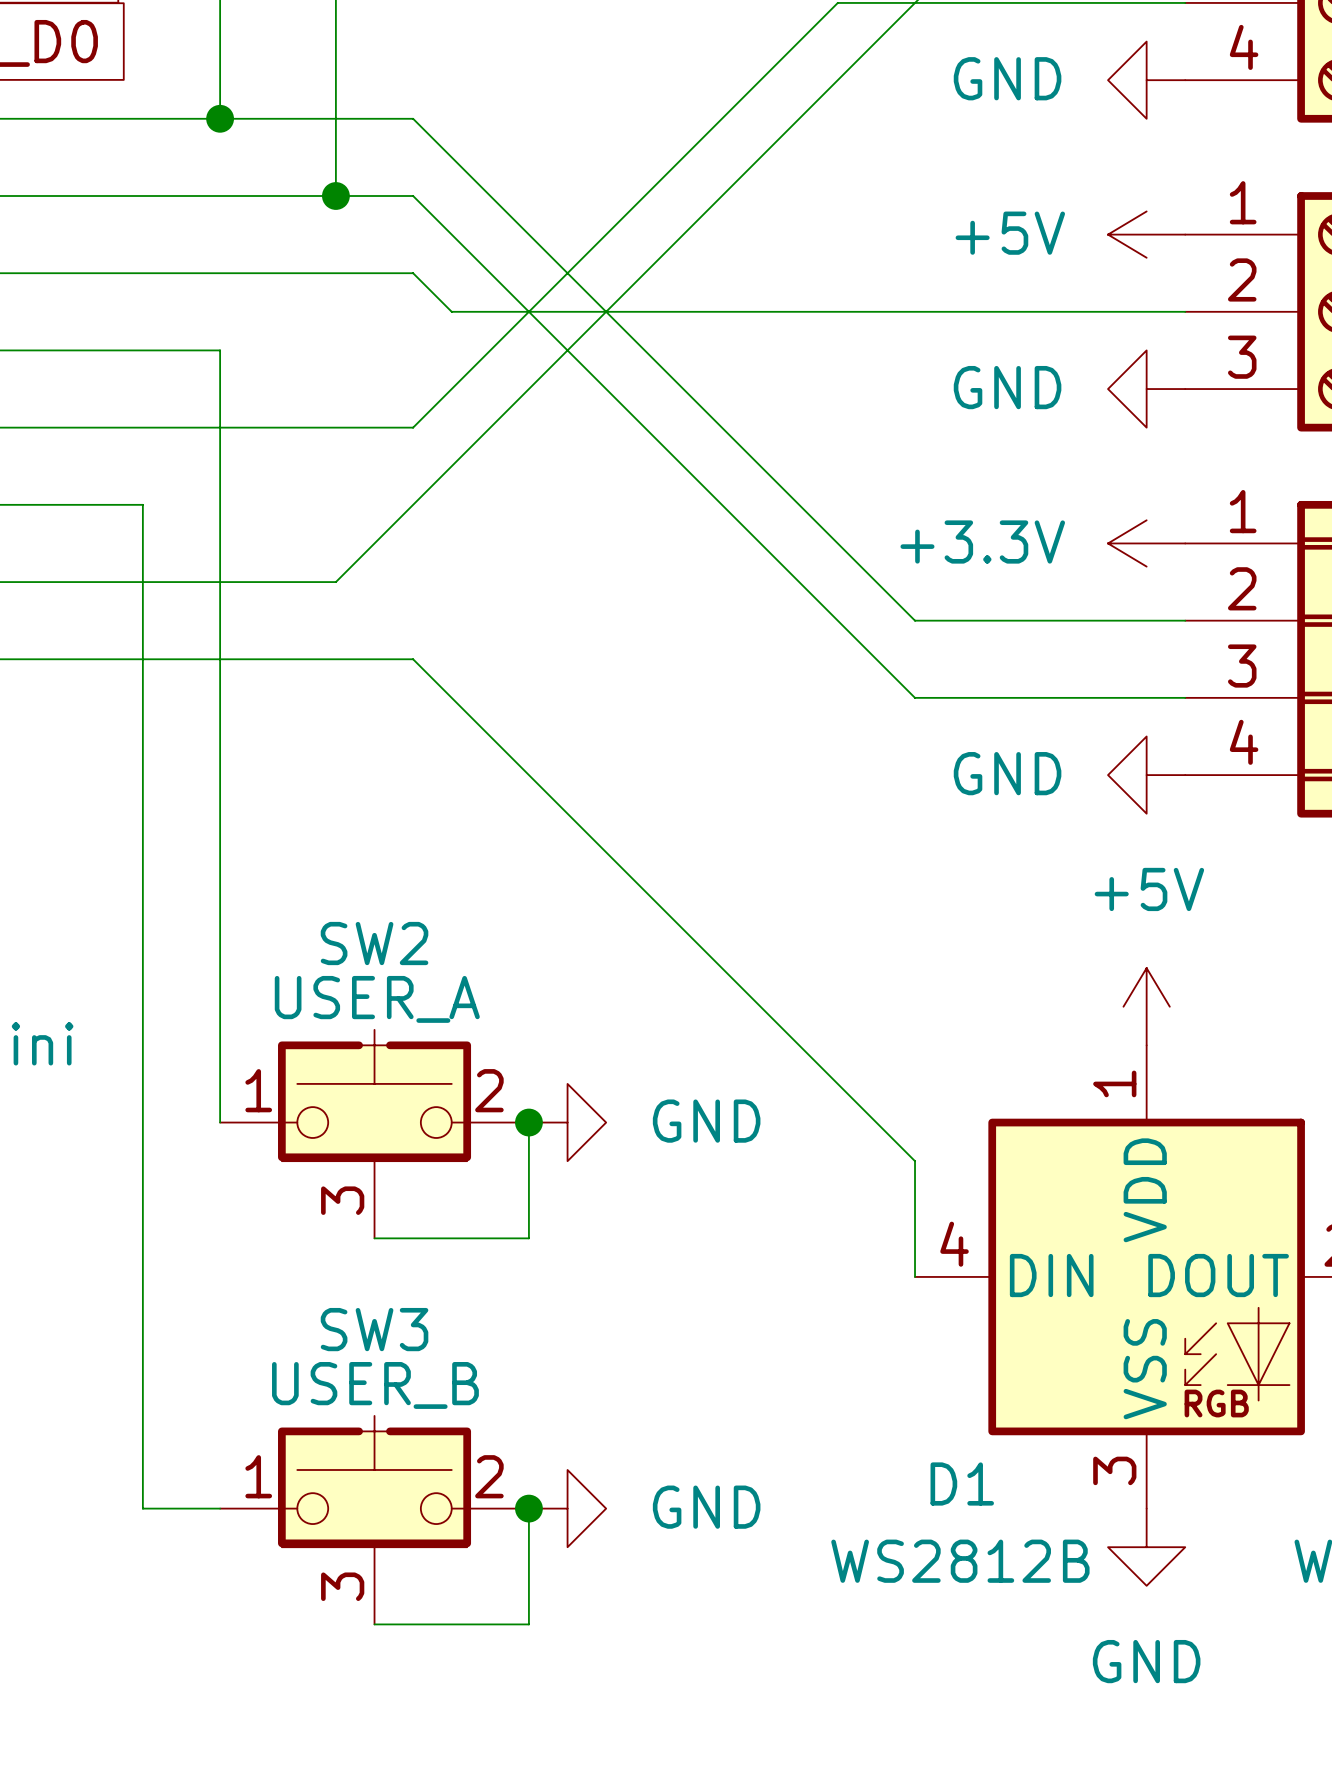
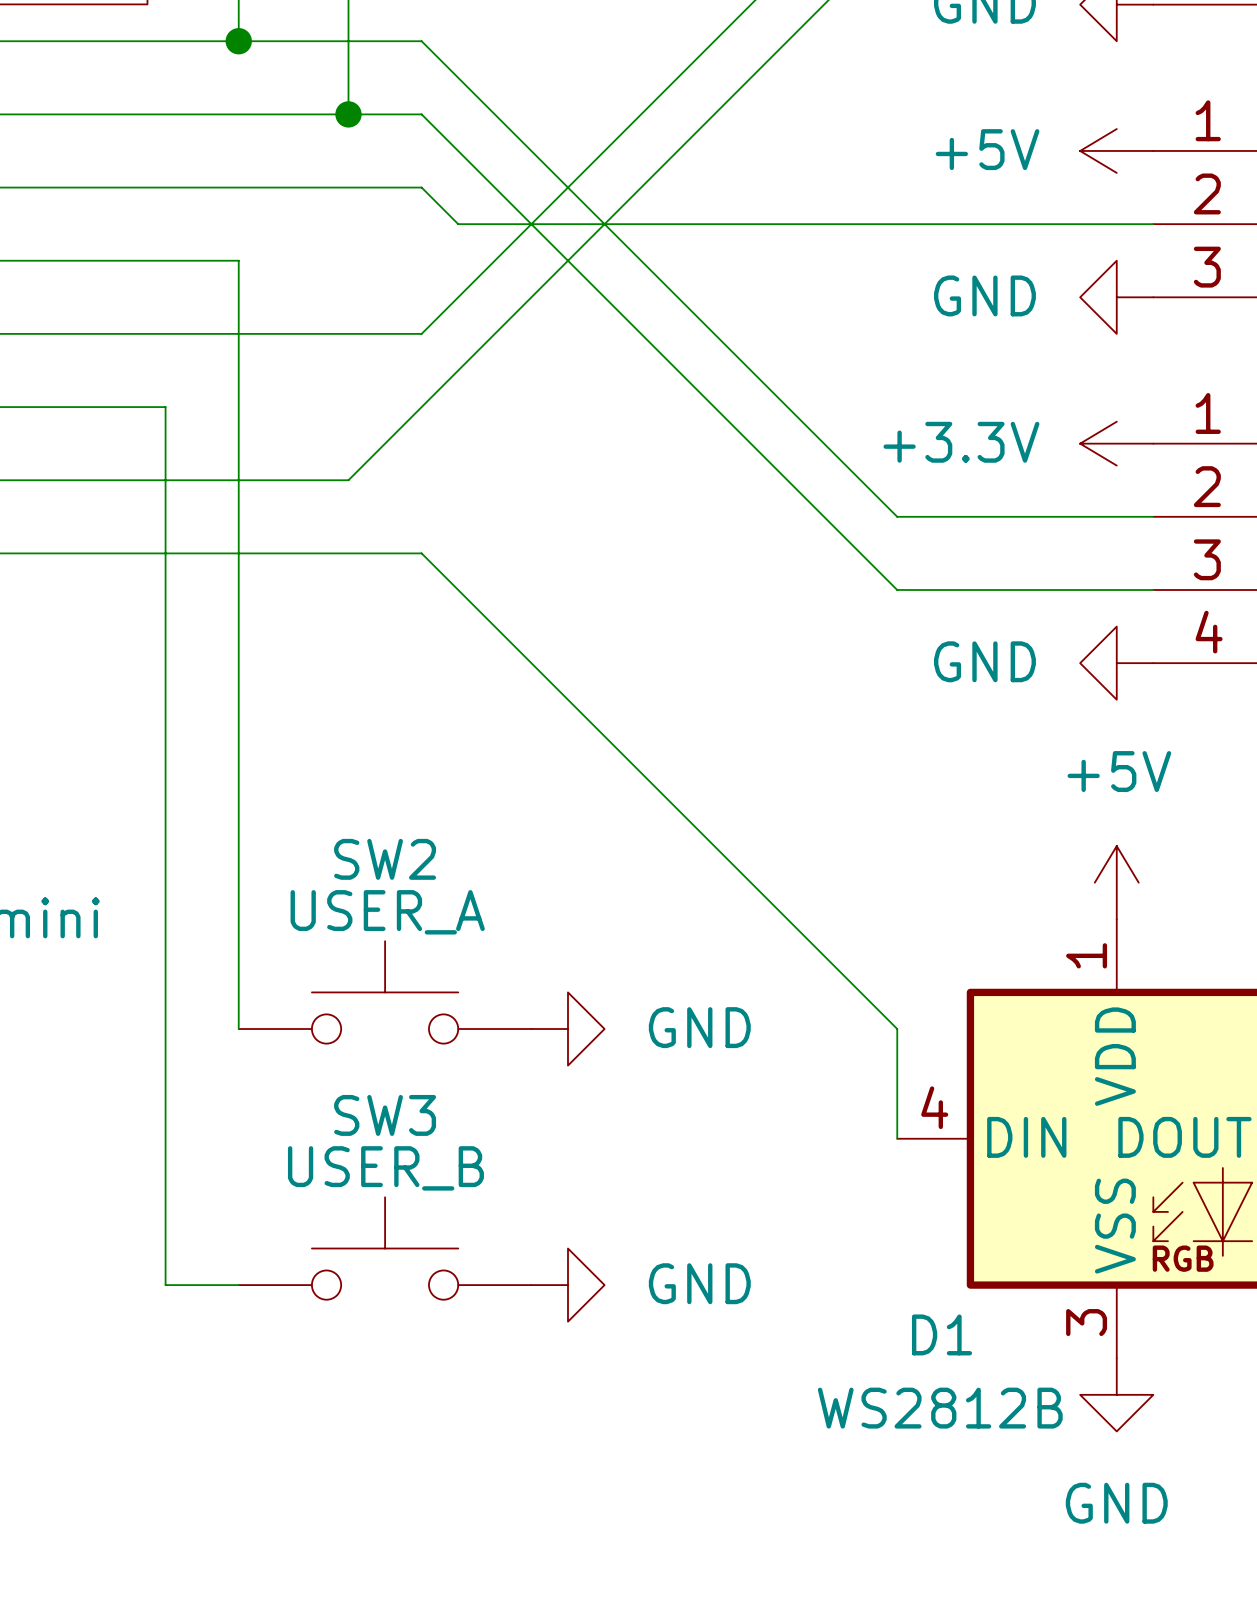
SW2 symbol: [220, 1029, 529, 1239] -> [238, 941, 532, 1044]
wire: none -> (238, 992) (238, 1029)
wire: (528, 1122) (528, 1238) (374, 1238) -> none
junction: (528, 1122) -> none
power symbol position: GND (567, 1122) -> GND (567, 1029)
SW3 symbol: [220, 1415, 529, 1625] -> [238, 1197, 532, 1300]
wire: (142, 1431) (142, 1508) (220, 1508) -> (165, 1285) (238, 1285)
wire: (528, 1508) (528, 1624) (374, 1624) -> none
junction: (528, 1508) -> none
power symbol position: GND (567, 1508) -> GND (567, 1285)

